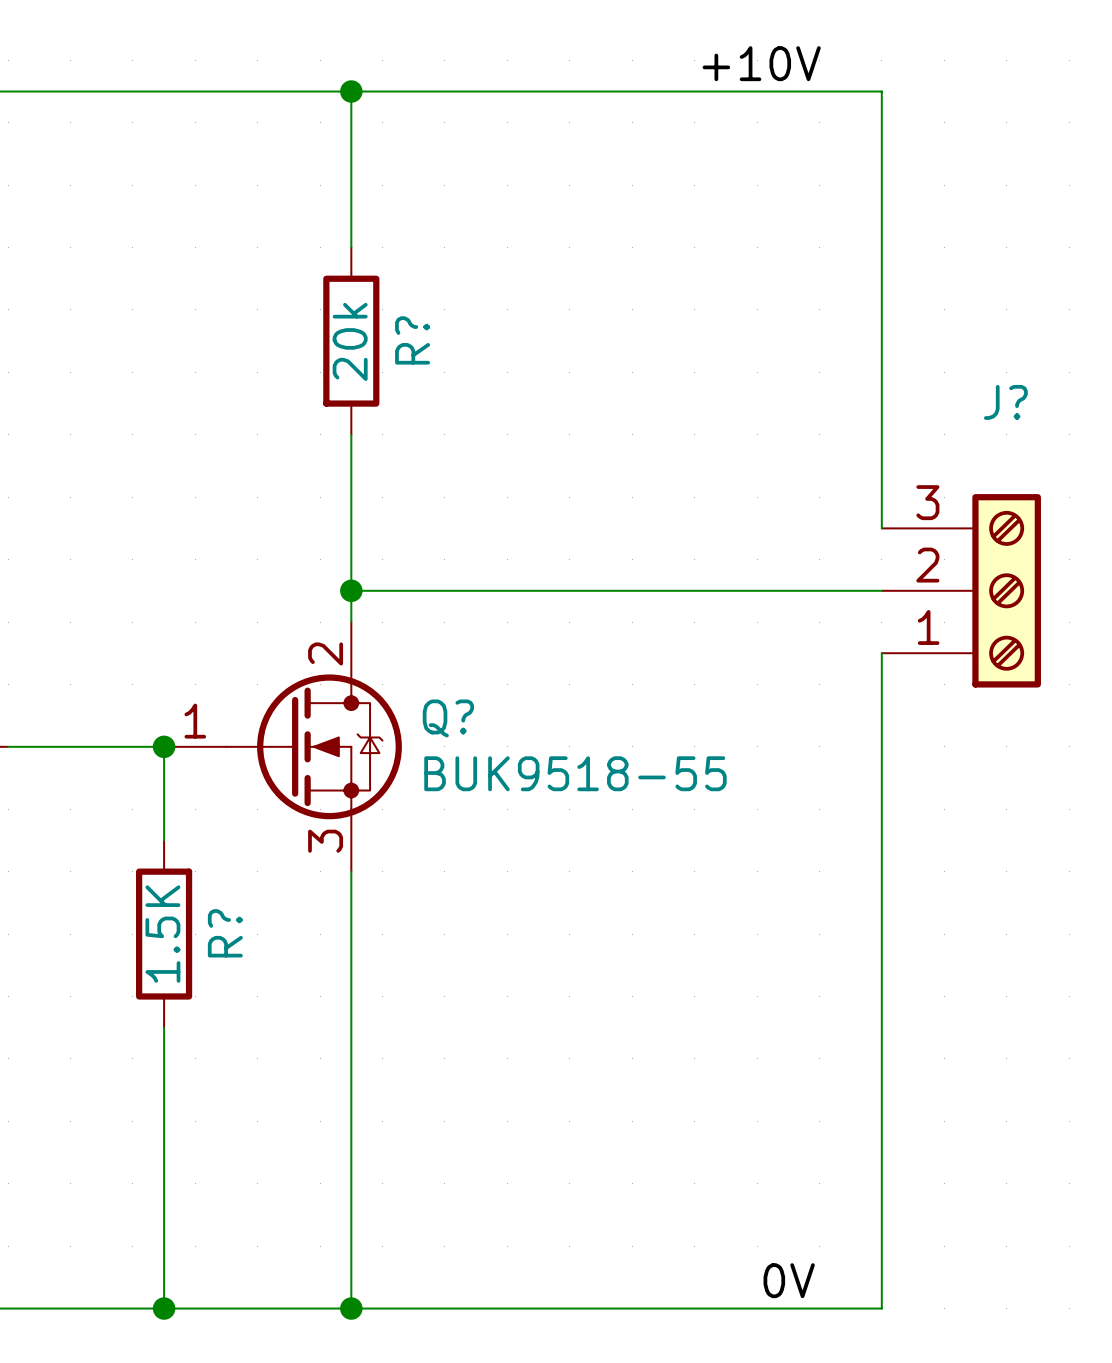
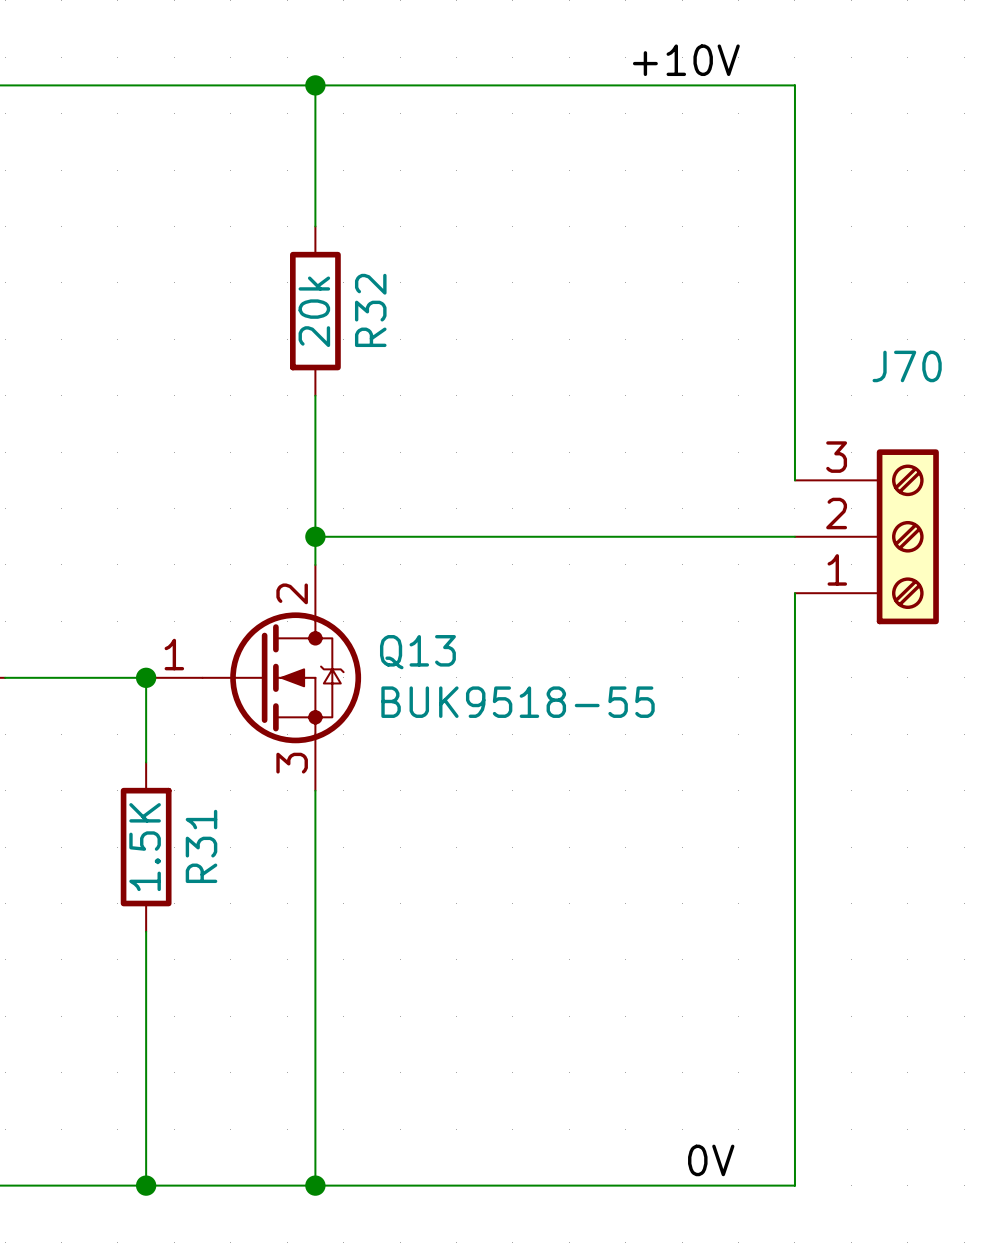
R? name: R? (412, 340) -> R32 (370, 310)
J? name: J? (1005, 402) -> J70 (907, 366)
Q? name: Q? (448, 718) -> Q13 (417, 652)
R? name: R? (225, 933) -> R31 (201, 846)

